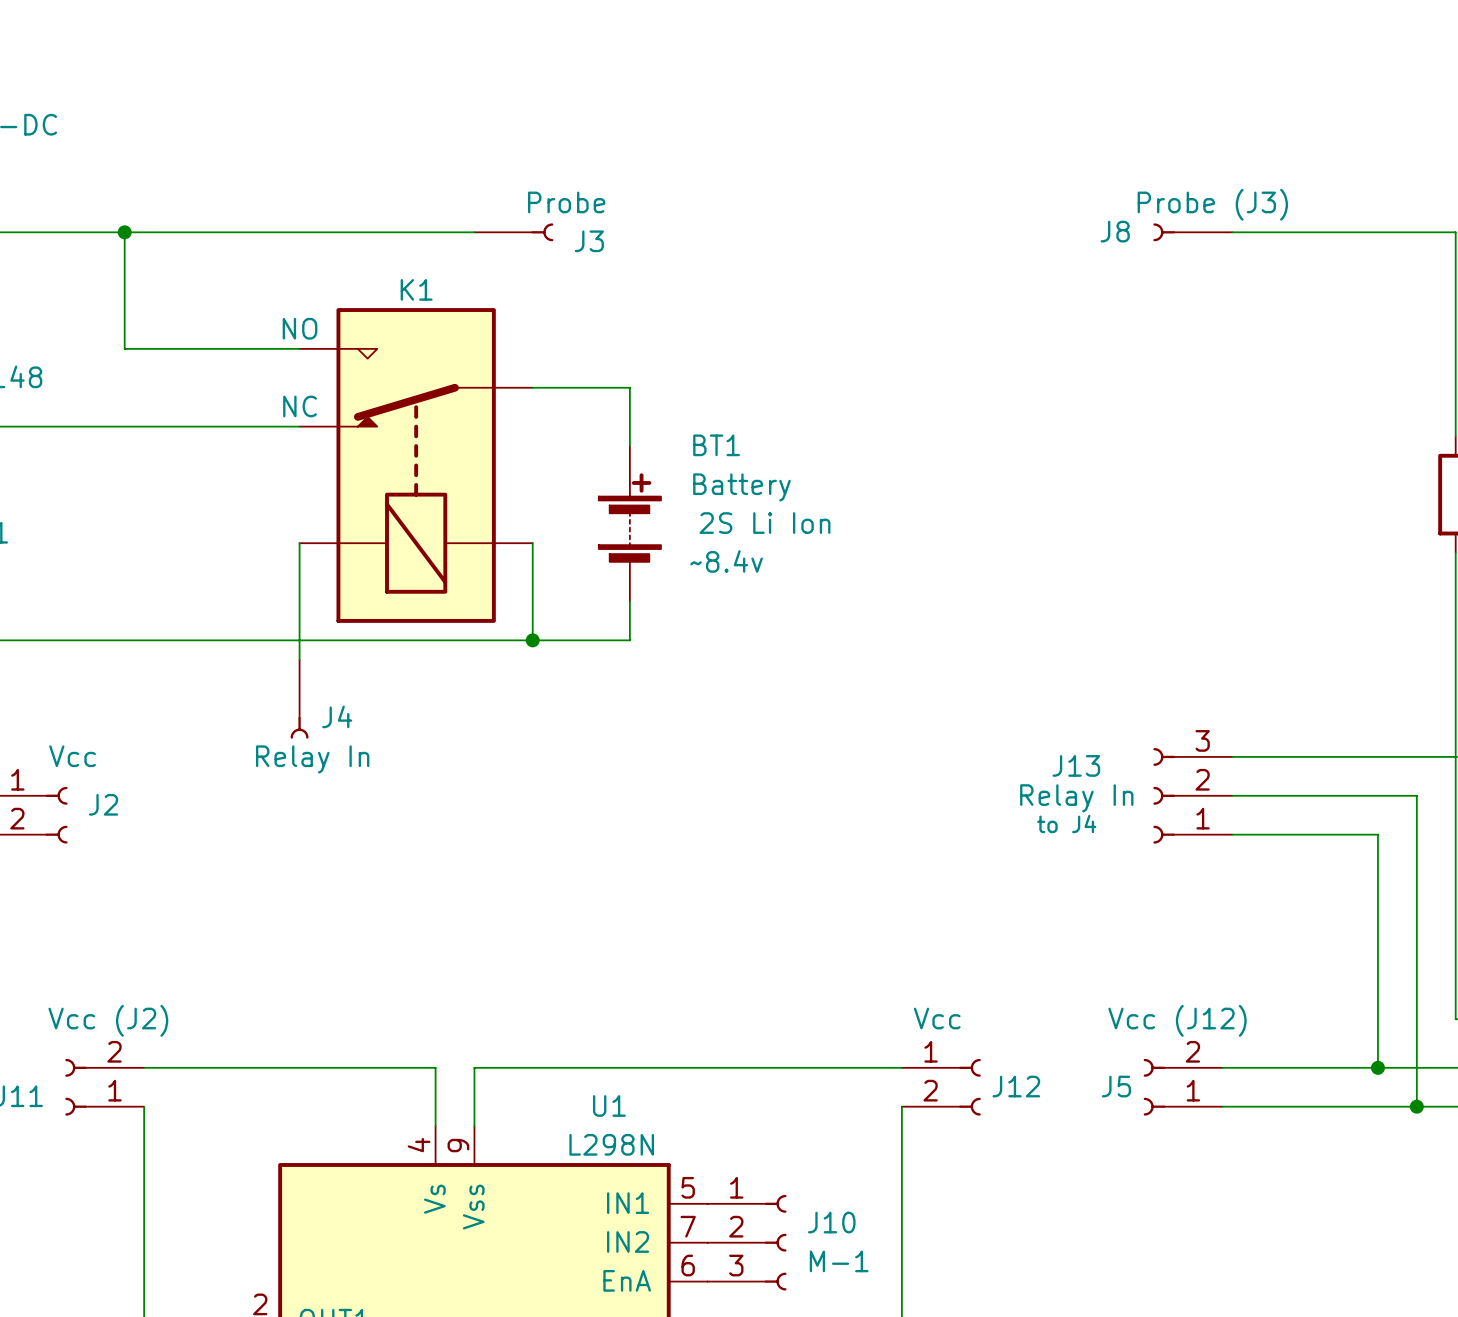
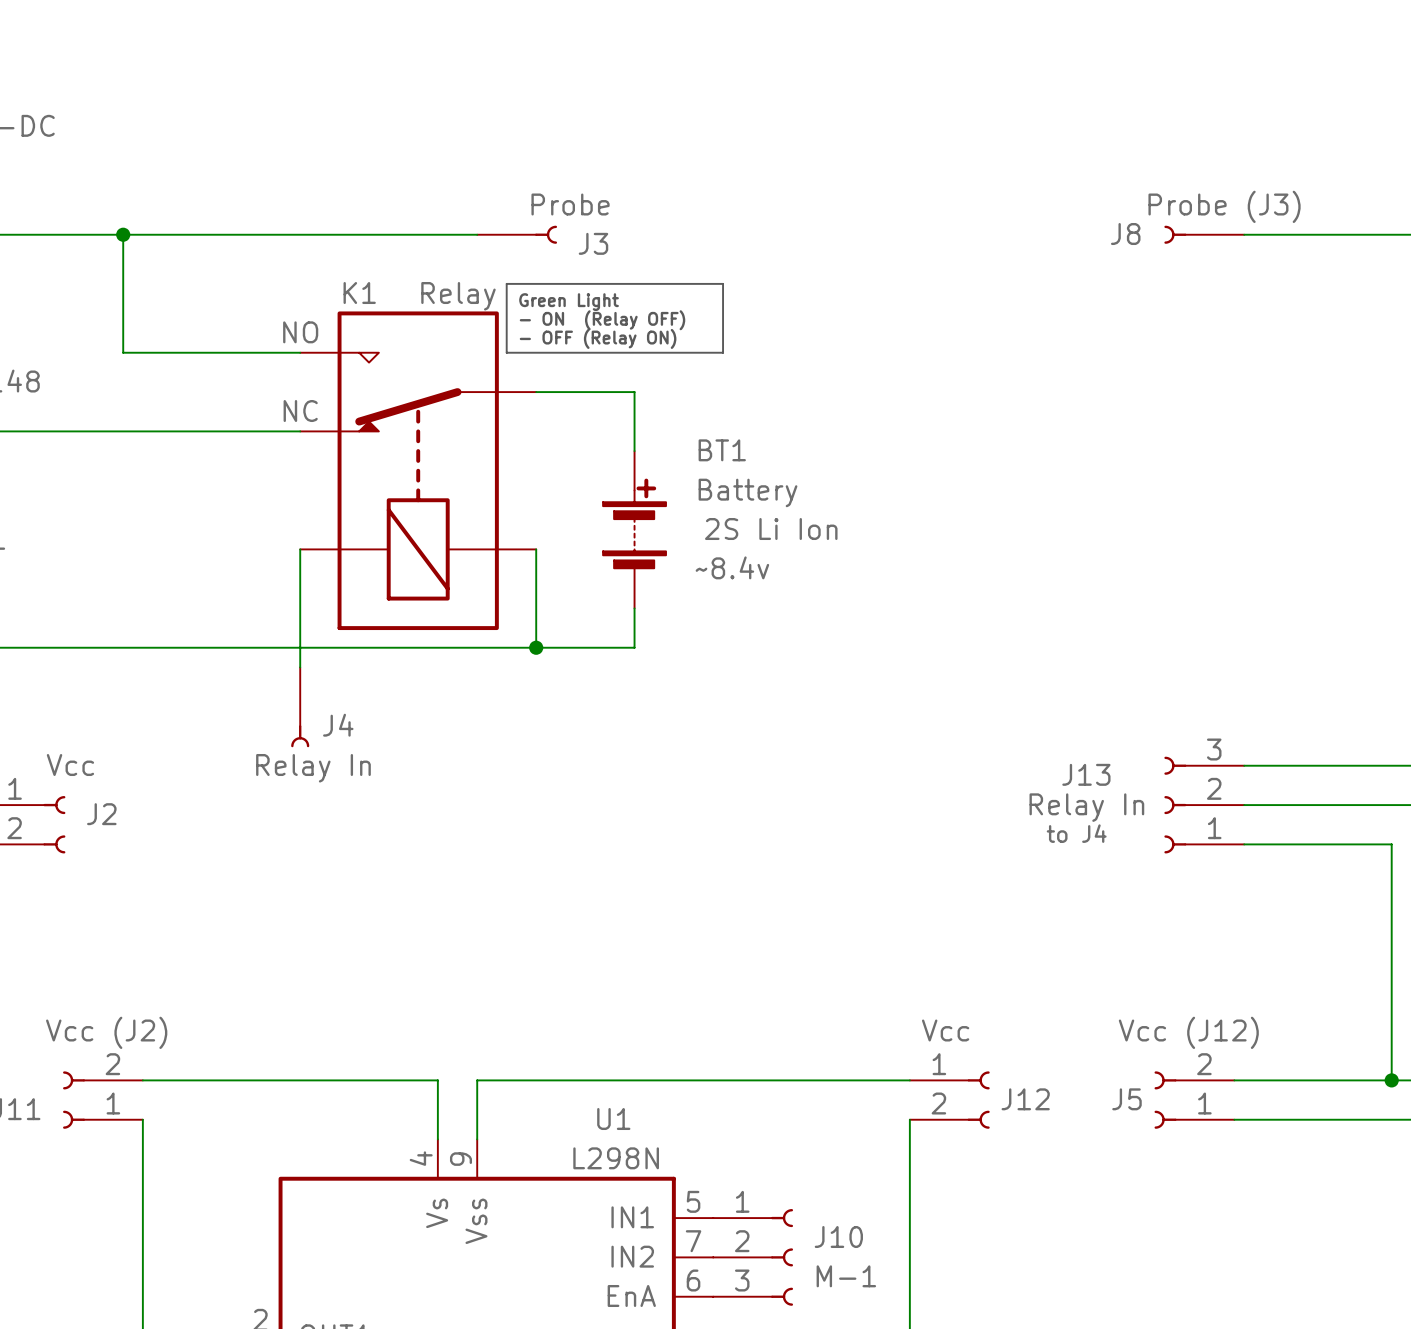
line: none -> (506, 283) (723, 283) (723, 352) (506, 352) (506, 283)
K1 name position: K1 (416, 289) -> K1 (359, 293)
K1 text: none -> Relay (458, 296)
text: none -> Green Light (569, 302)
text: none -> - ON (Relay OFF) (602, 320)
text: none -> - OFF (Relay ON) (598, 338)

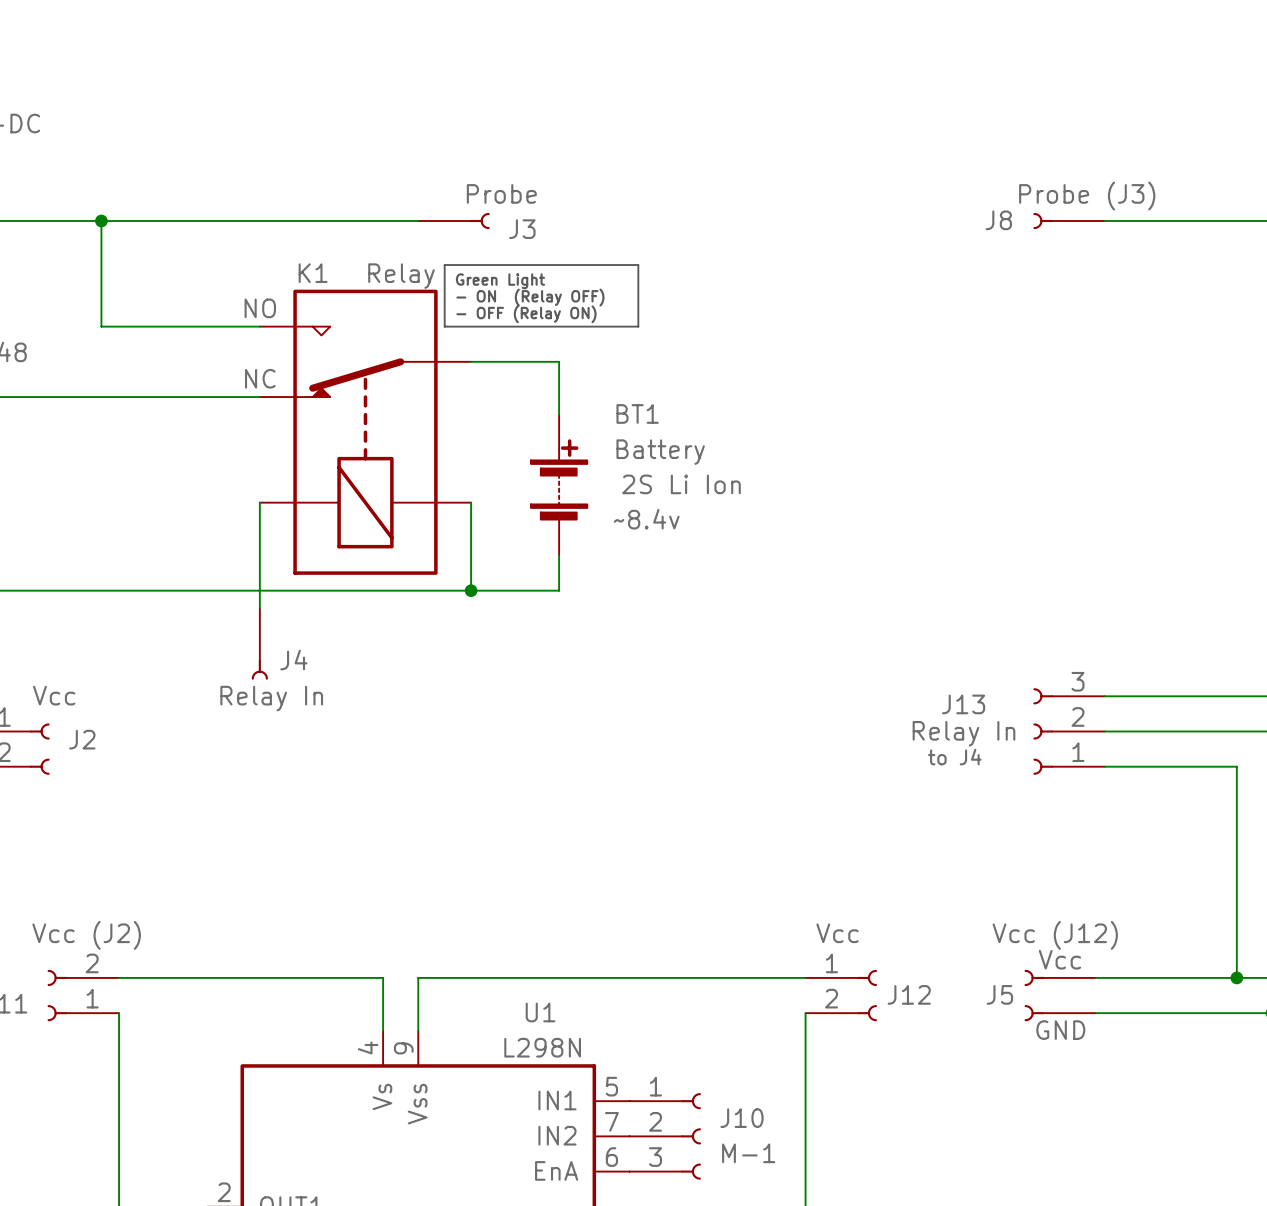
J5 text: none -> Vcc (1059, 959)
J5 pin number: 2 (1204, 1064) -> none
J5 pin number: 1 (1204, 1103) -> none
J5 text: none -> GND (1060, 1030)

